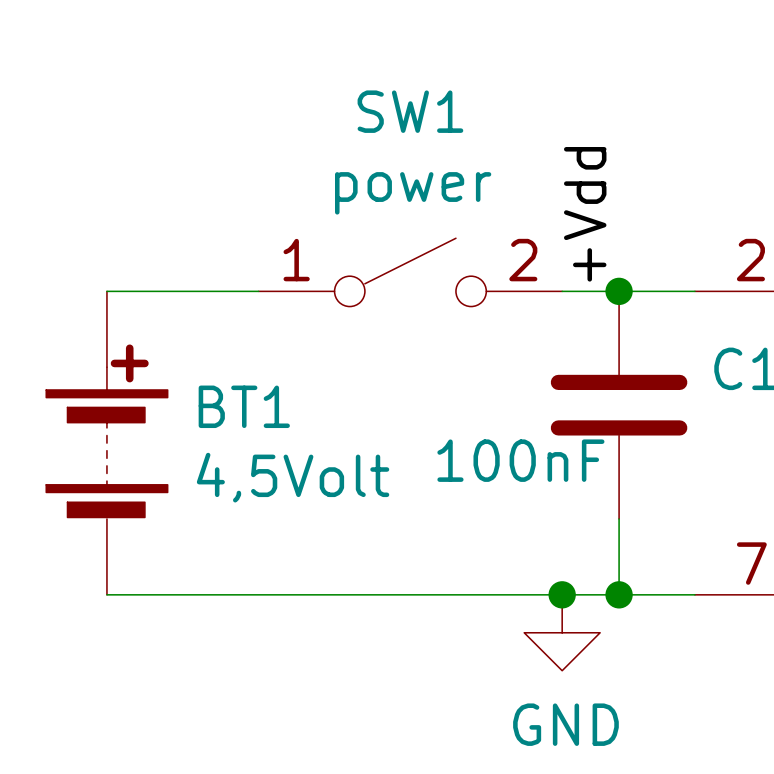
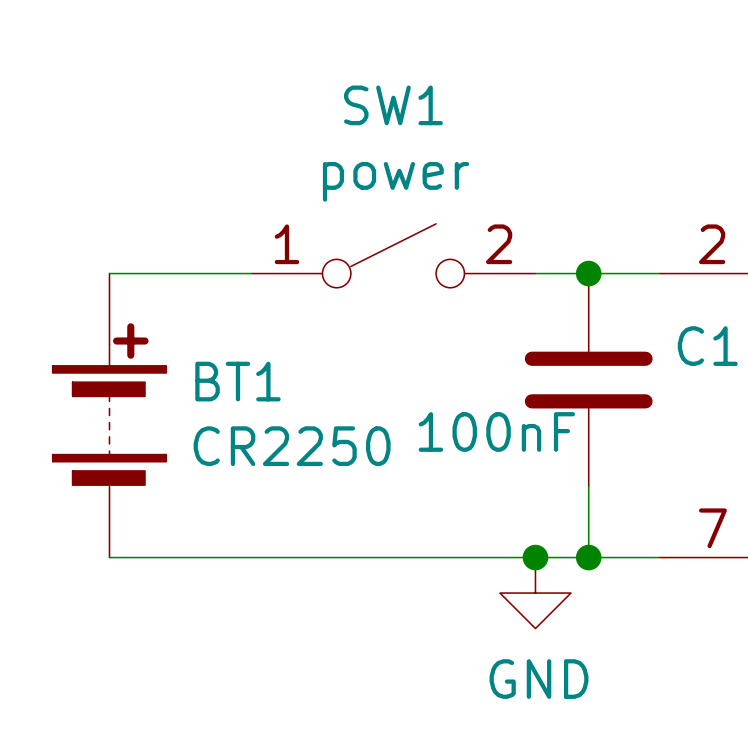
label: +Vdd (585, 214) -> none
BT1 value: 4,5Volt (293, 477) -> CR2250 (292, 446)

